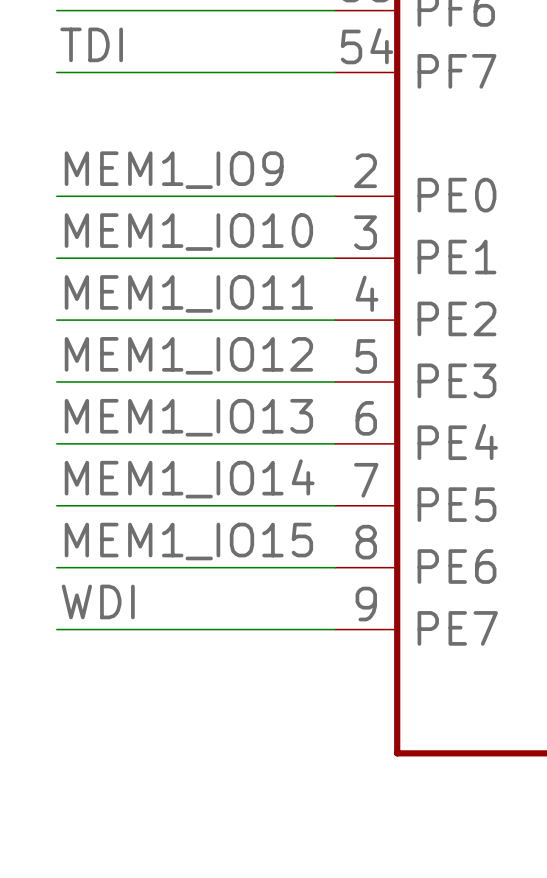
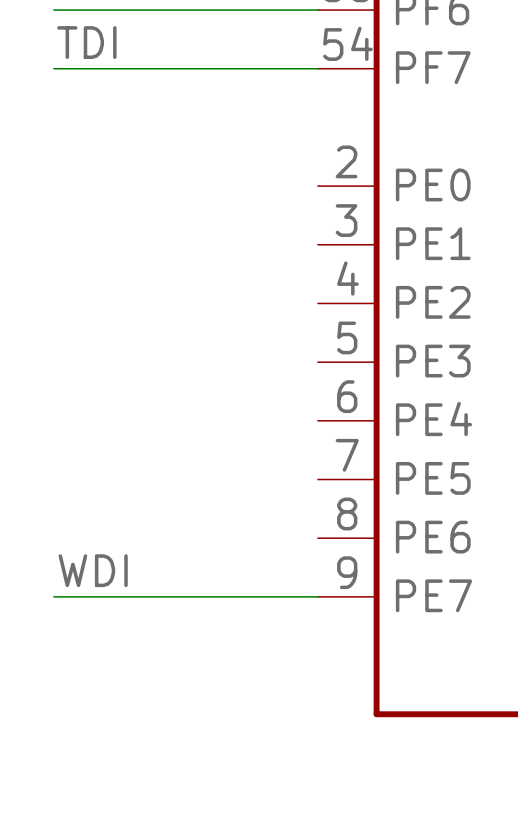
label: MEM1_IO9 (174, 170) -> none
wire: (56, 196) (335, 196) -> none
label: MEM1_IO10 (188, 232) -> none
wire: (56, 258) (335, 258) -> none
label: MEM1_IO11 (188, 293) -> none
wire: (56, 320) (335, 320) -> none
label: MEM1_IO12 (188, 355) -> none
wire: (56, 381) (335, 381) -> none
label: MEM1_IO13 (188, 417) -> none
wire: (56, 443) (335, 443) -> none
label: MEM1_IO14 (189, 478) -> none
wire: (56, 505) (335, 505) -> none
label: MEM1_IO15 (188, 541) -> none
wire: (56, 567) (335, 567) -> none

